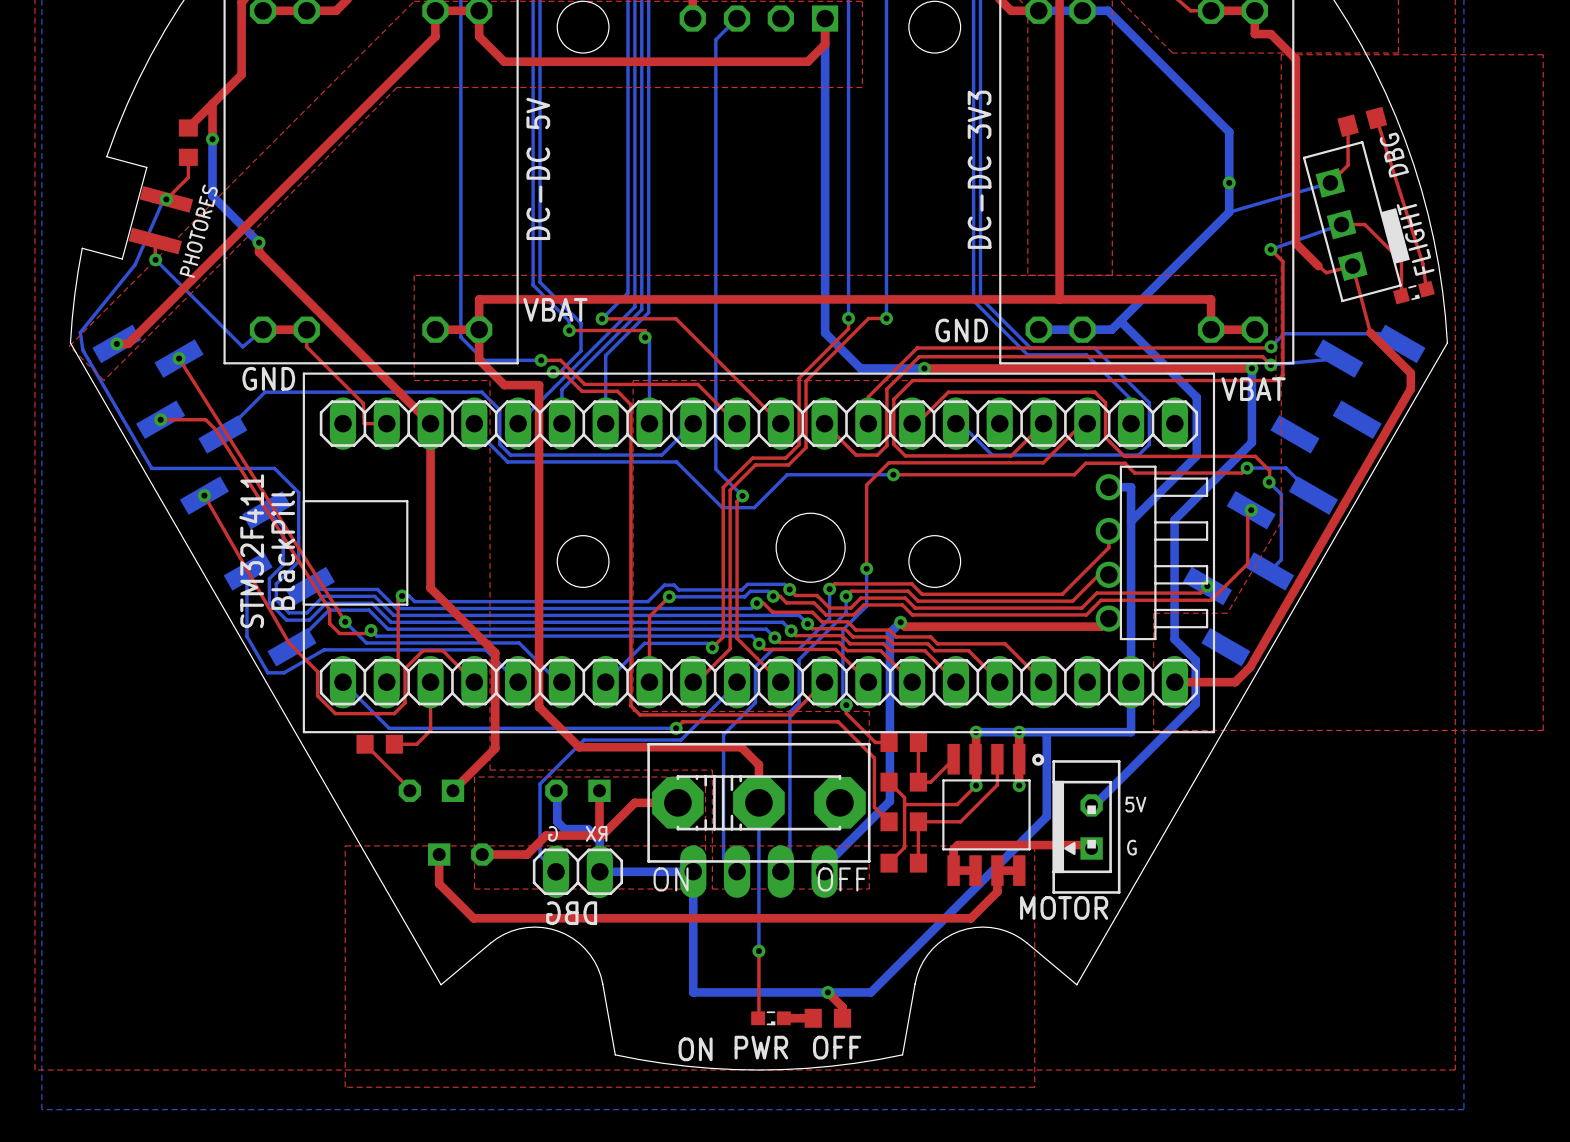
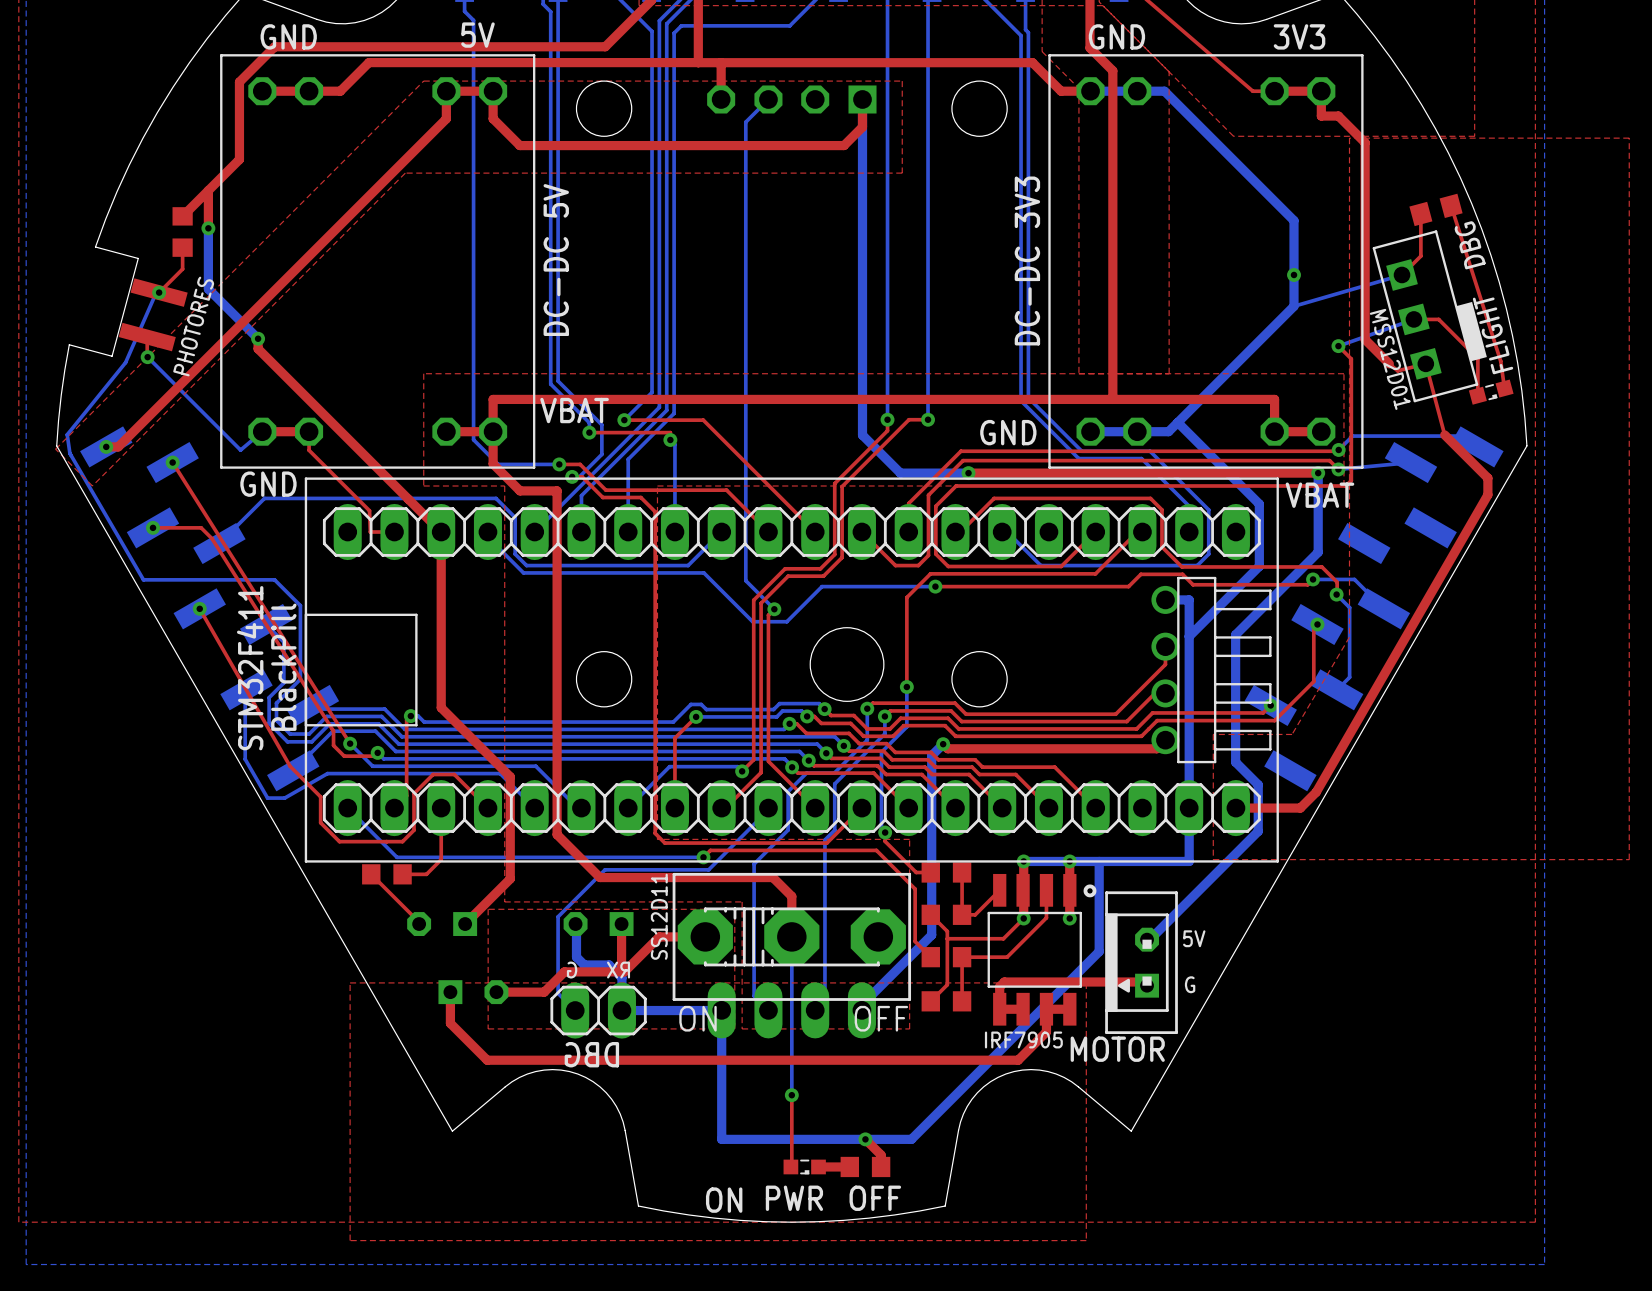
text: none -> MSS12D01 (1390, 359)
text: none -> SS12D11 (659, 916)
text: none -> IRF7905 (1023, 1039)

